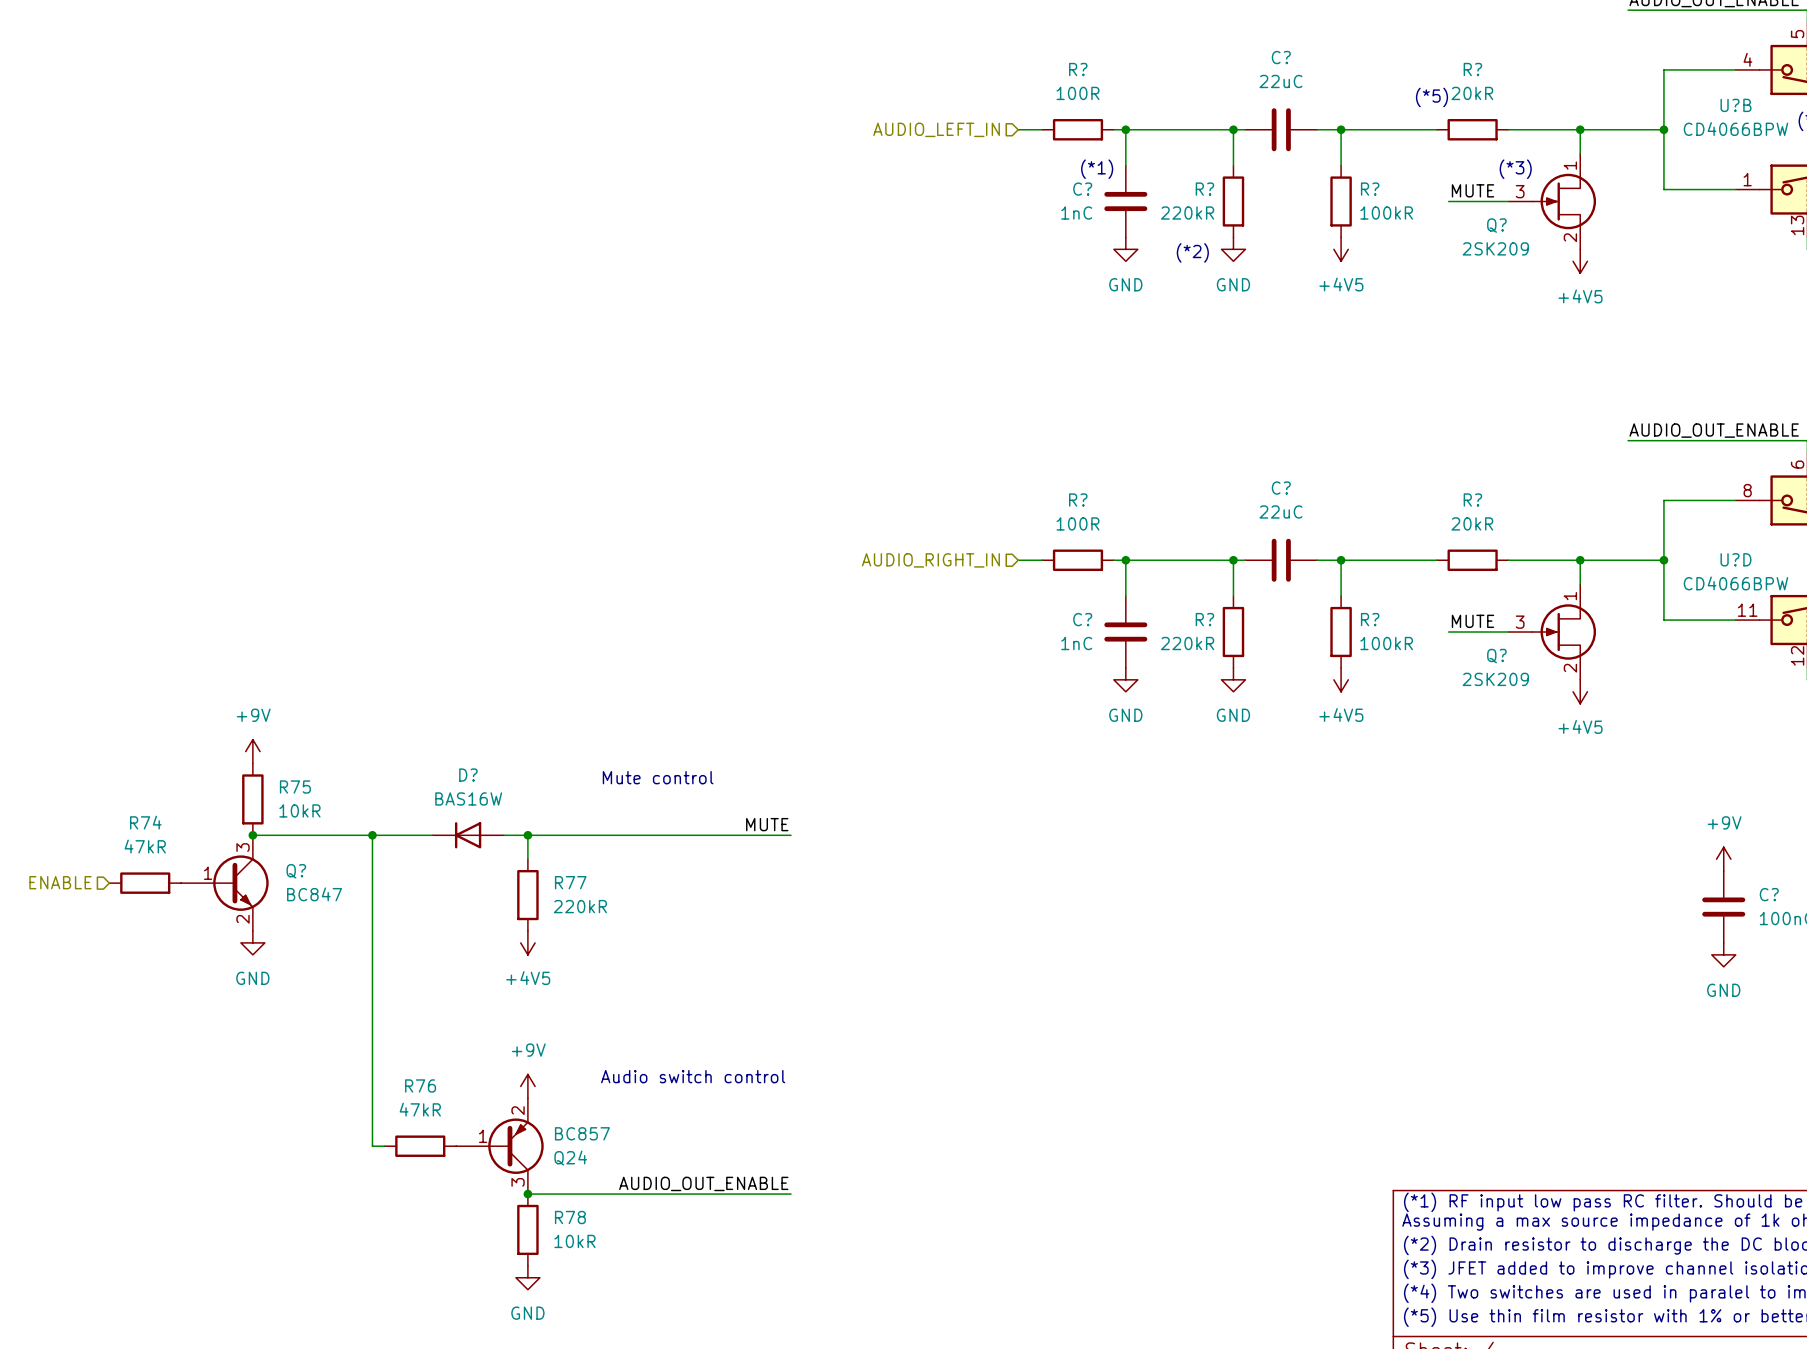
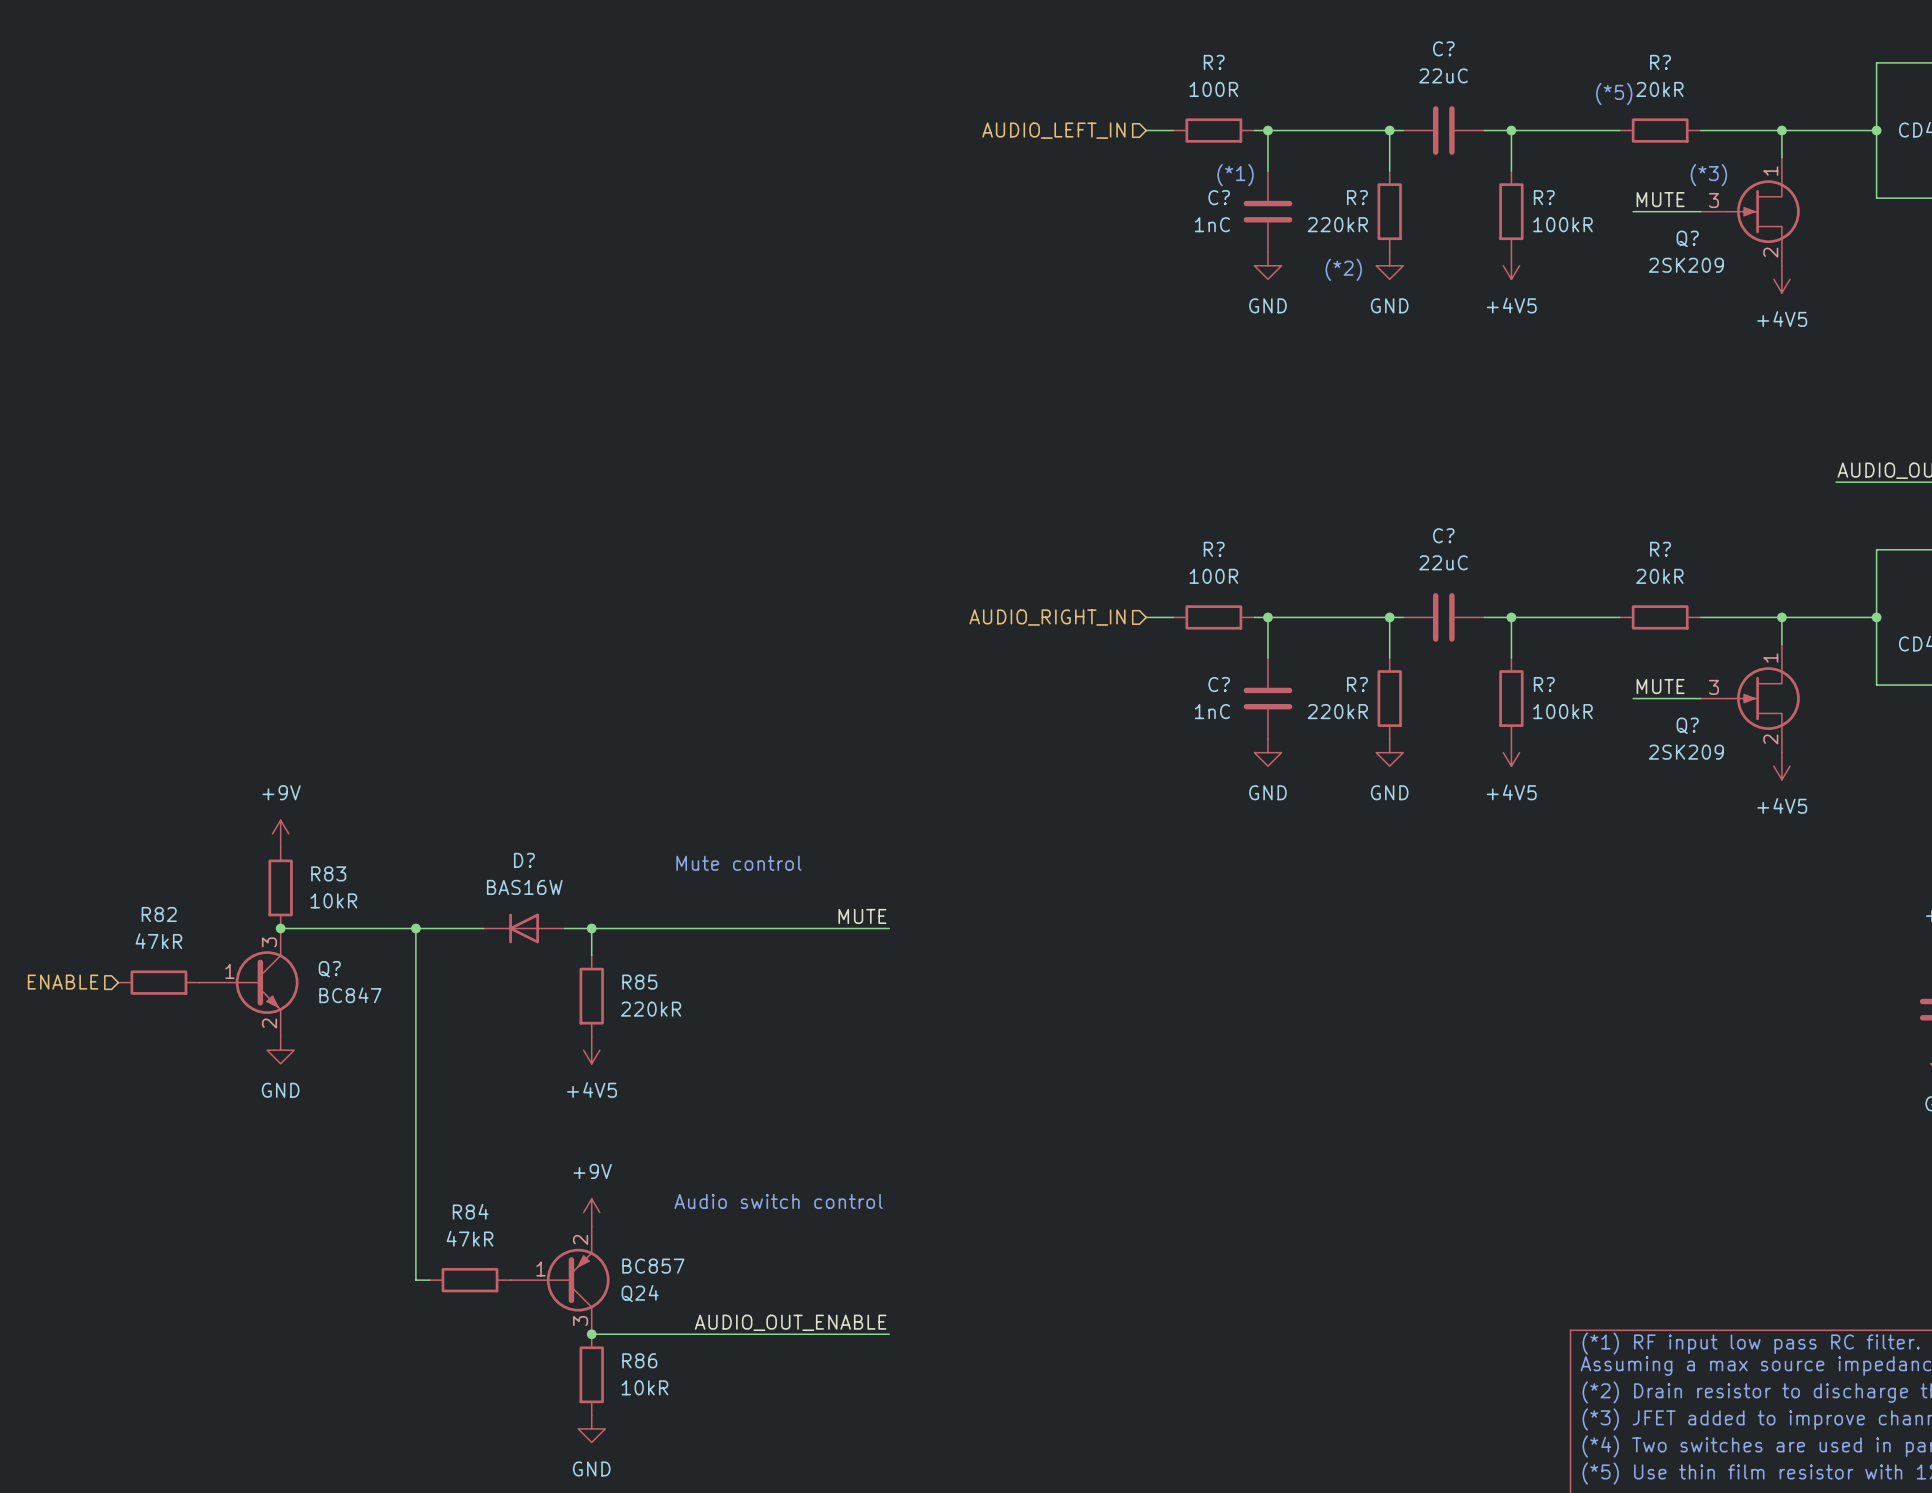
R75 name: R75 (295, 787) -> R83 (328, 873)
R74 name: R74 (145, 822) -> R82 (159, 914)
R77 name: R77 (570, 882) -> R85 (639, 982)
R76 name: R76 (420, 1085) -> R84 (470, 1211)
R78 name: R78 (570, 1217) -> R86 (639, 1360)

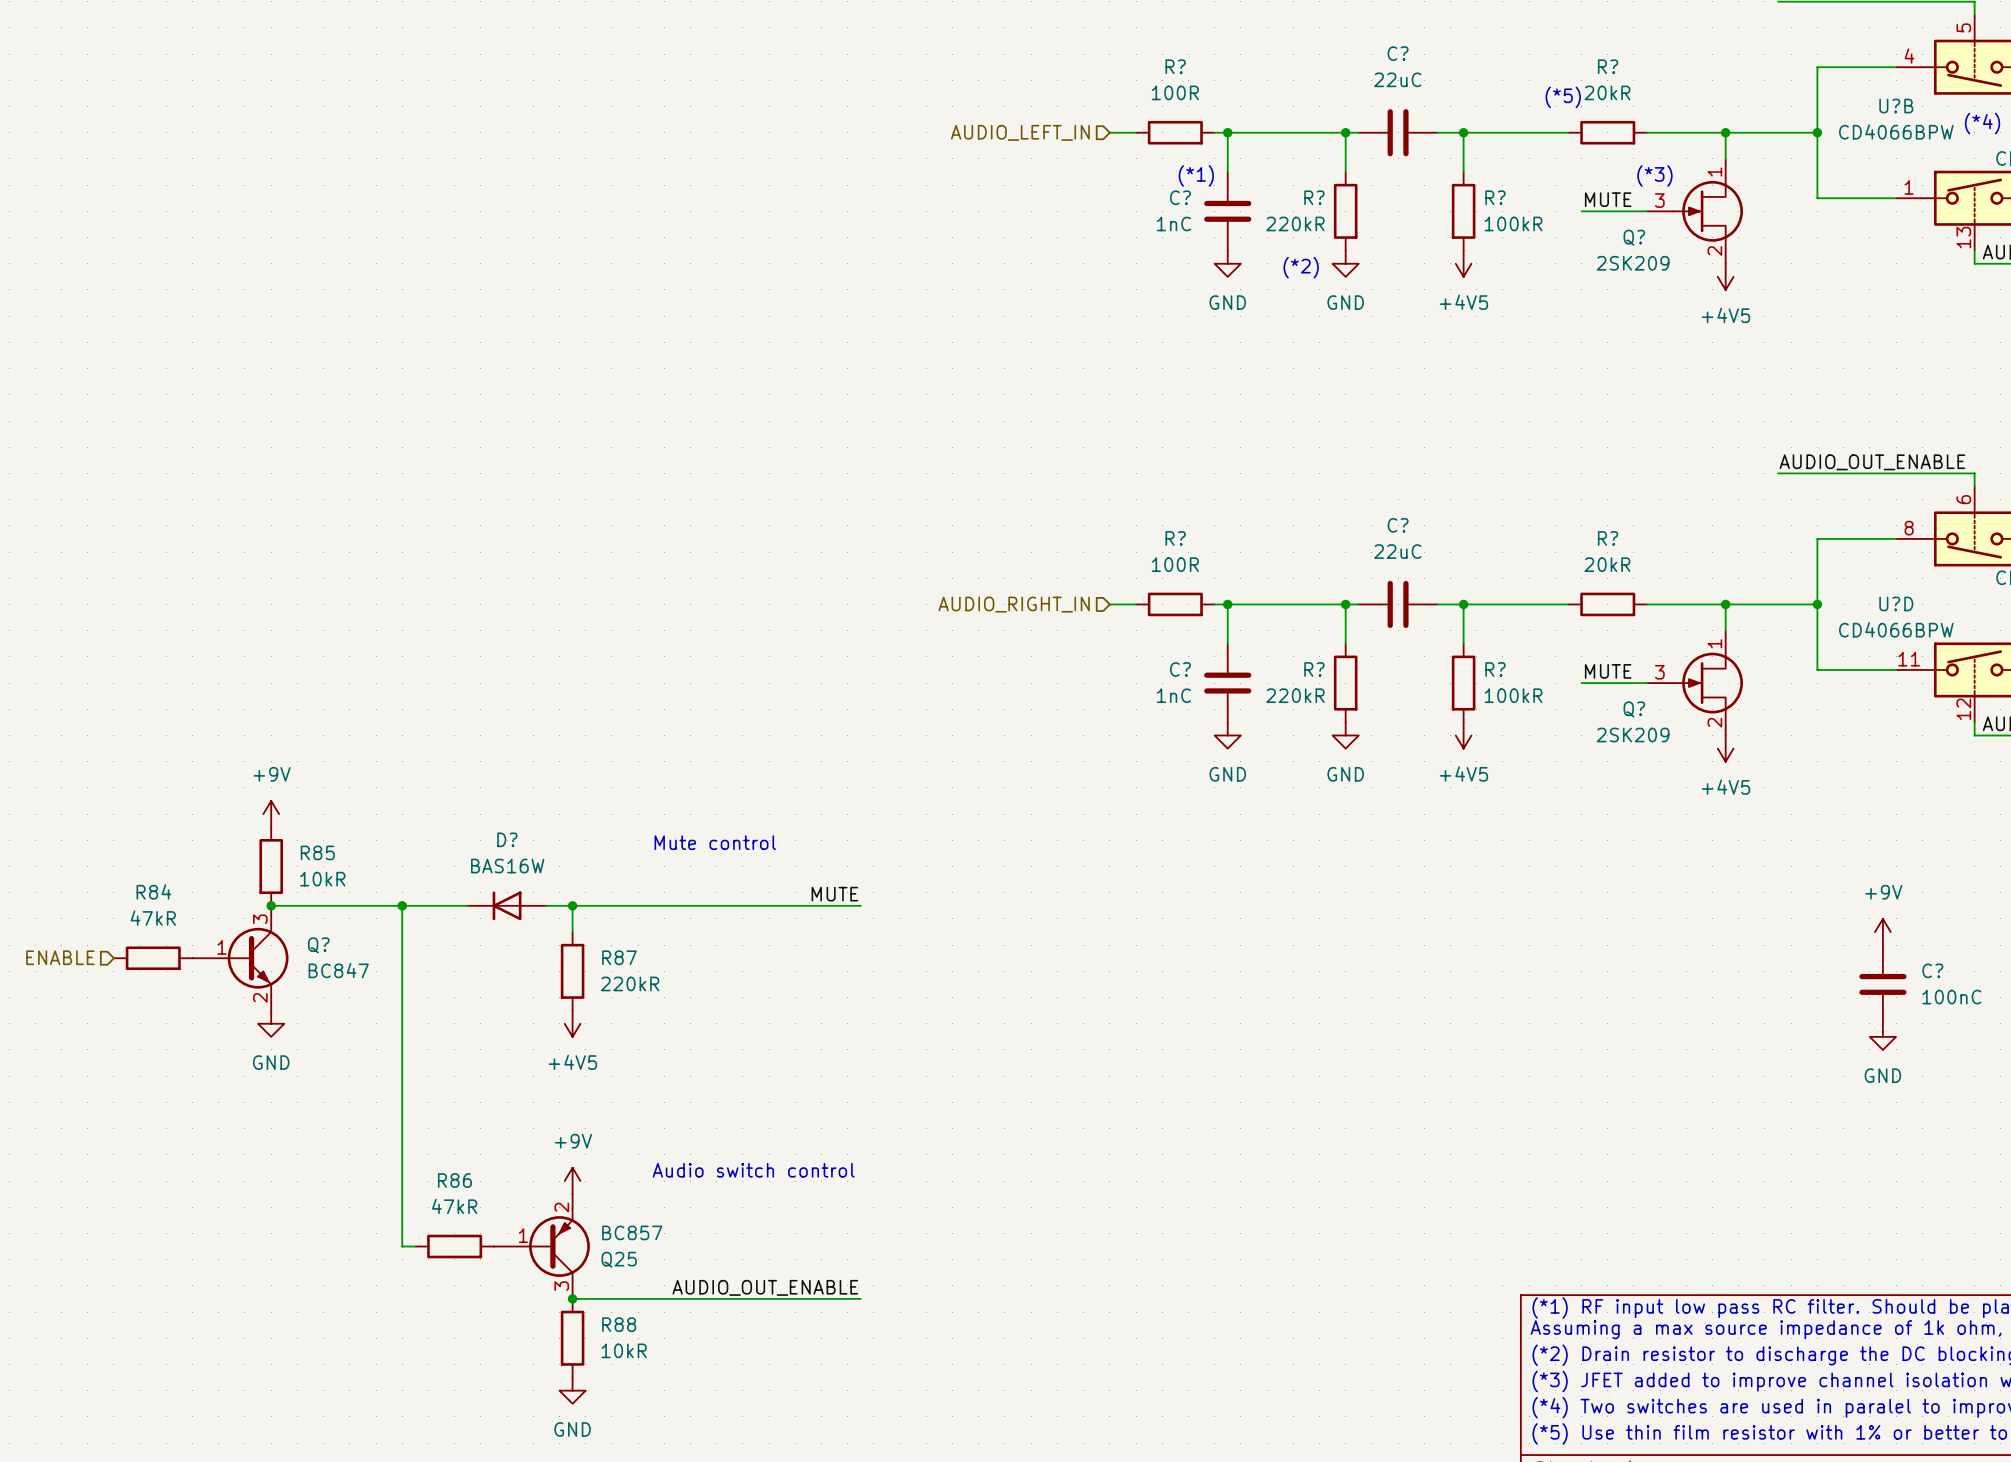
R83 name: R83 (328, 873) -> R85 (317, 852)
R82 name: R82 (159, 914) -> R84 (153, 891)
R85 name: R85 (639, 982) -> R87 (619, 957)
R84 name: R84 (470, 1211) -> R86 (454, 1180)
Q24 name: Q24 (640, 1293) -> Q25 (619, 1259)
R86 name: R86 (639, 1360) -> R88 (619, 1324)

